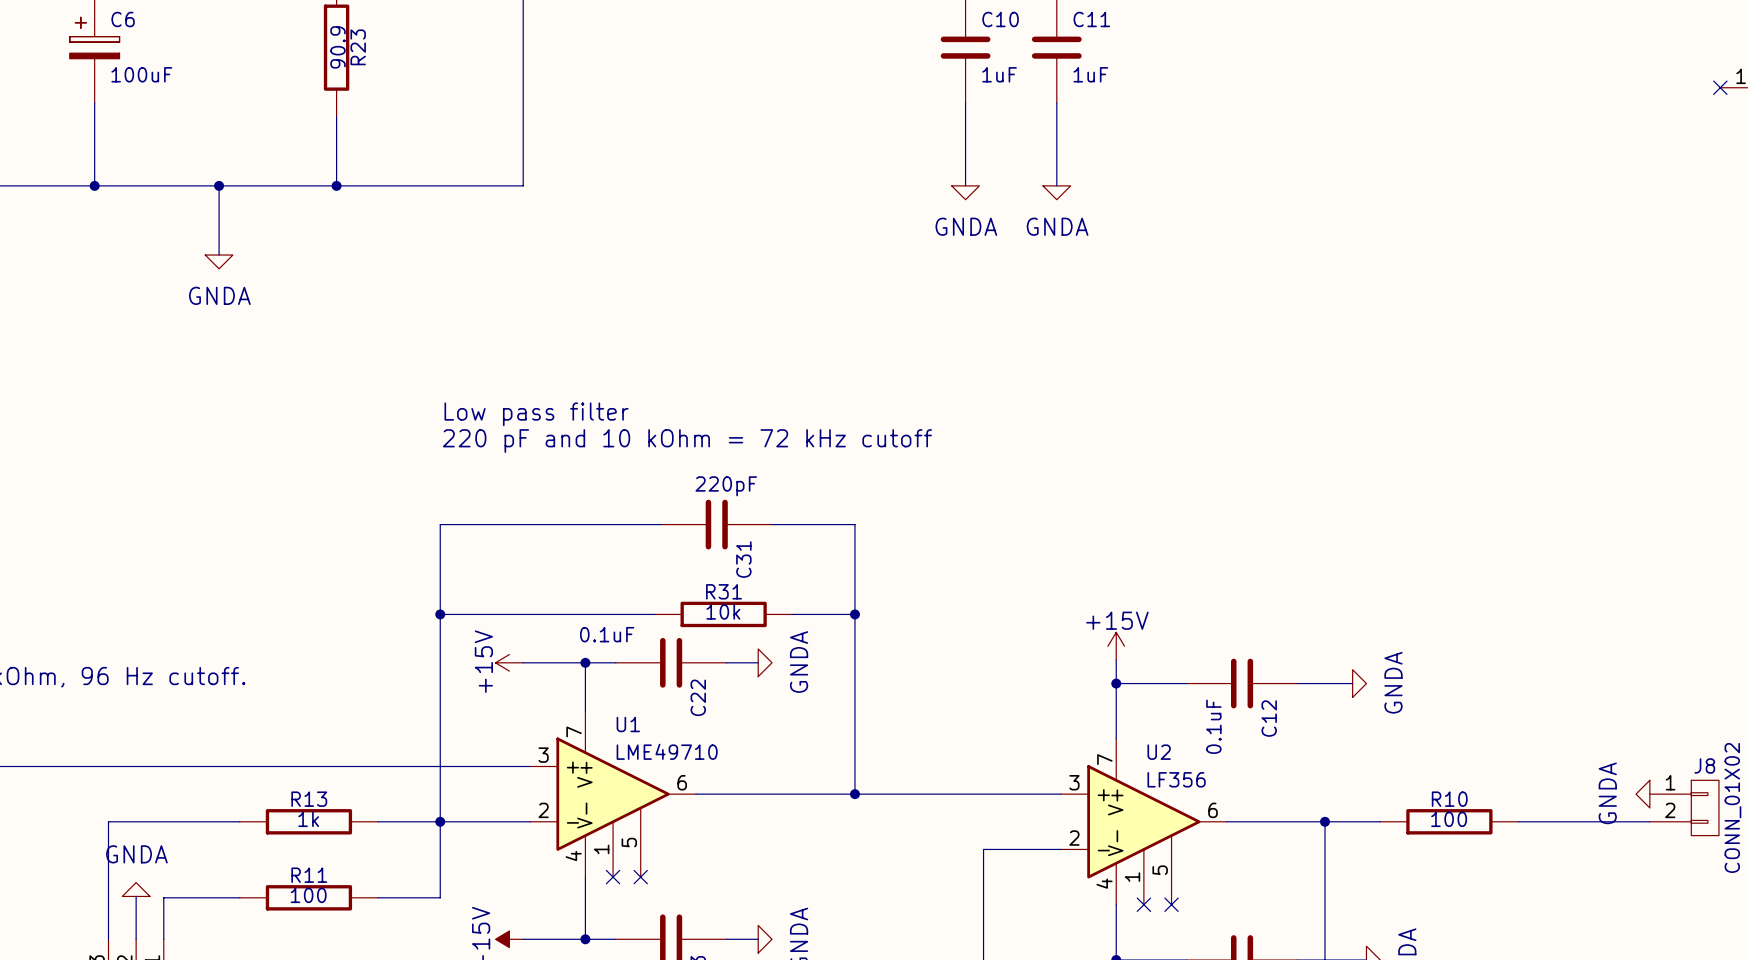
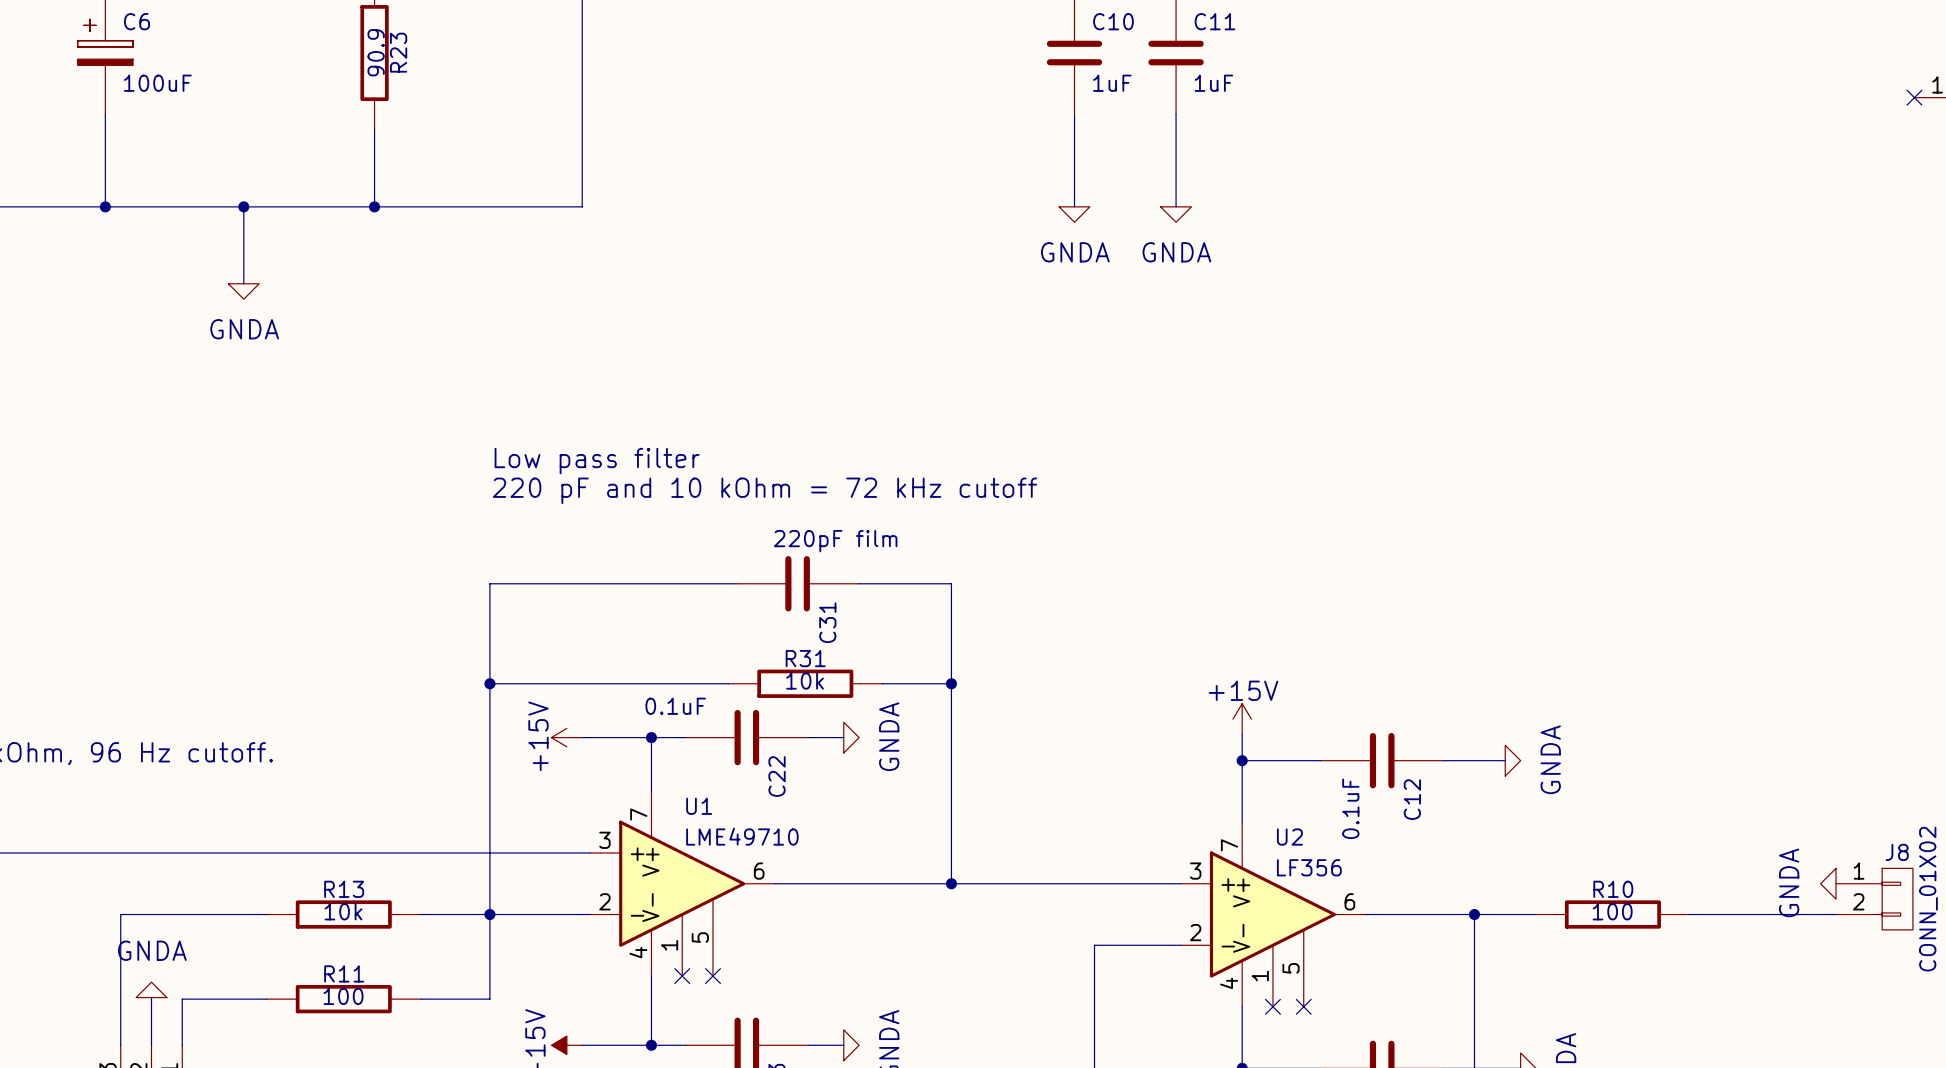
C31 value: 220pF (726, 486) -> 220pF film (835, 541)
R13 value: 1k (308, 819) -> 10k (343, 911)

